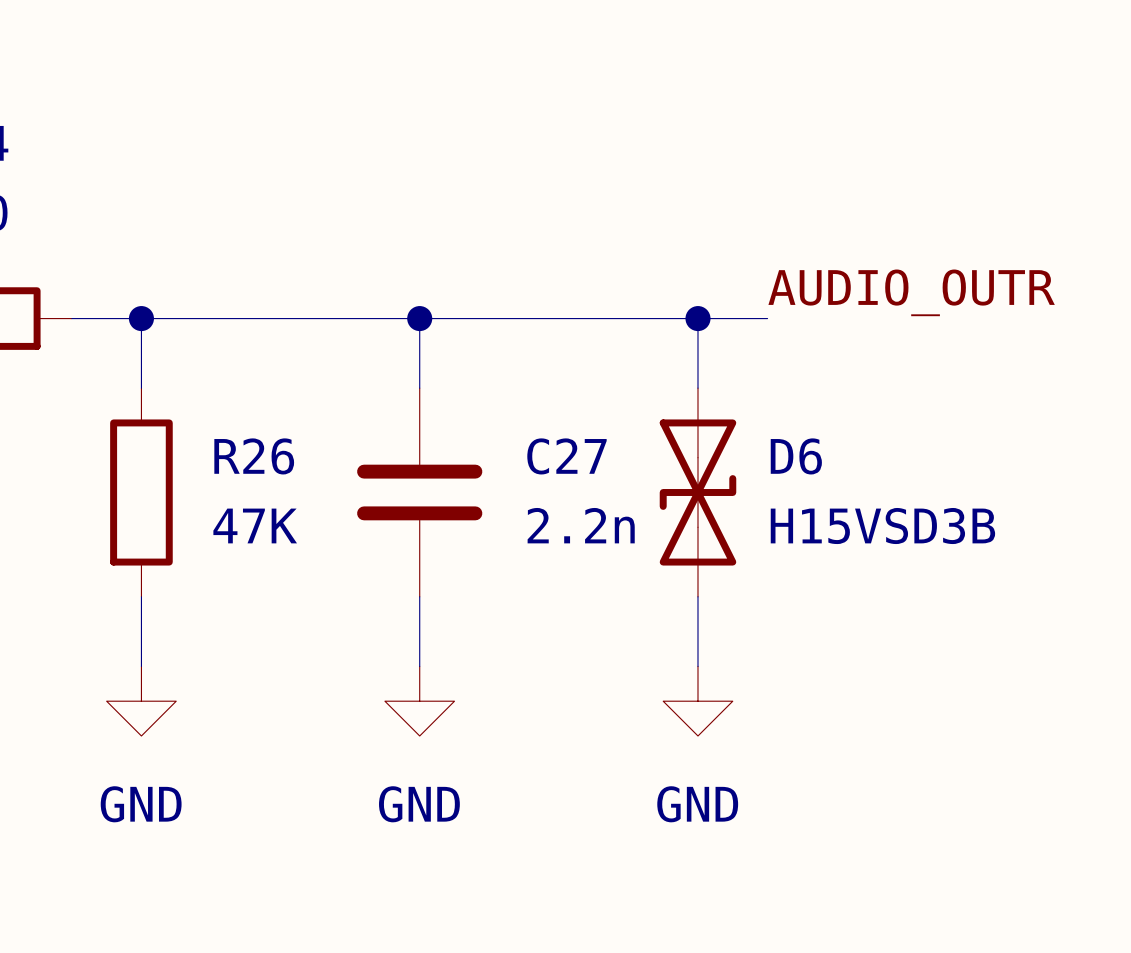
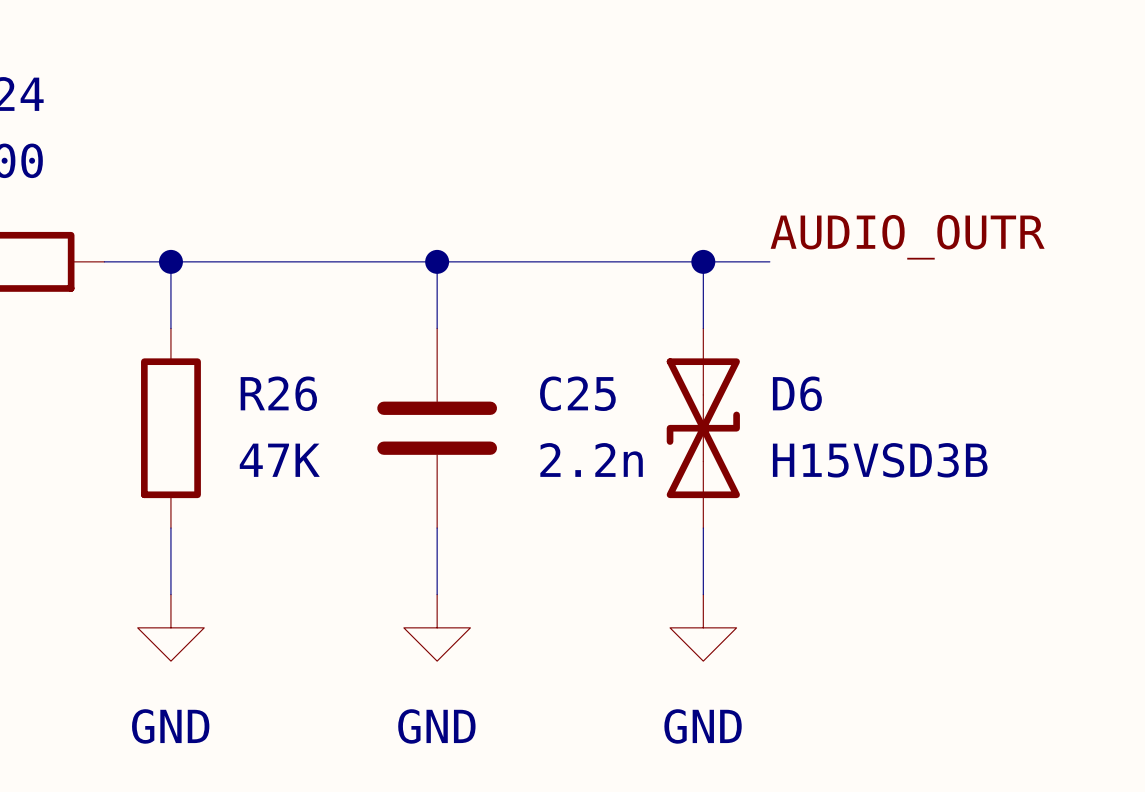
C27 name: C27 (566, 456) -> C25 (577, 393)

